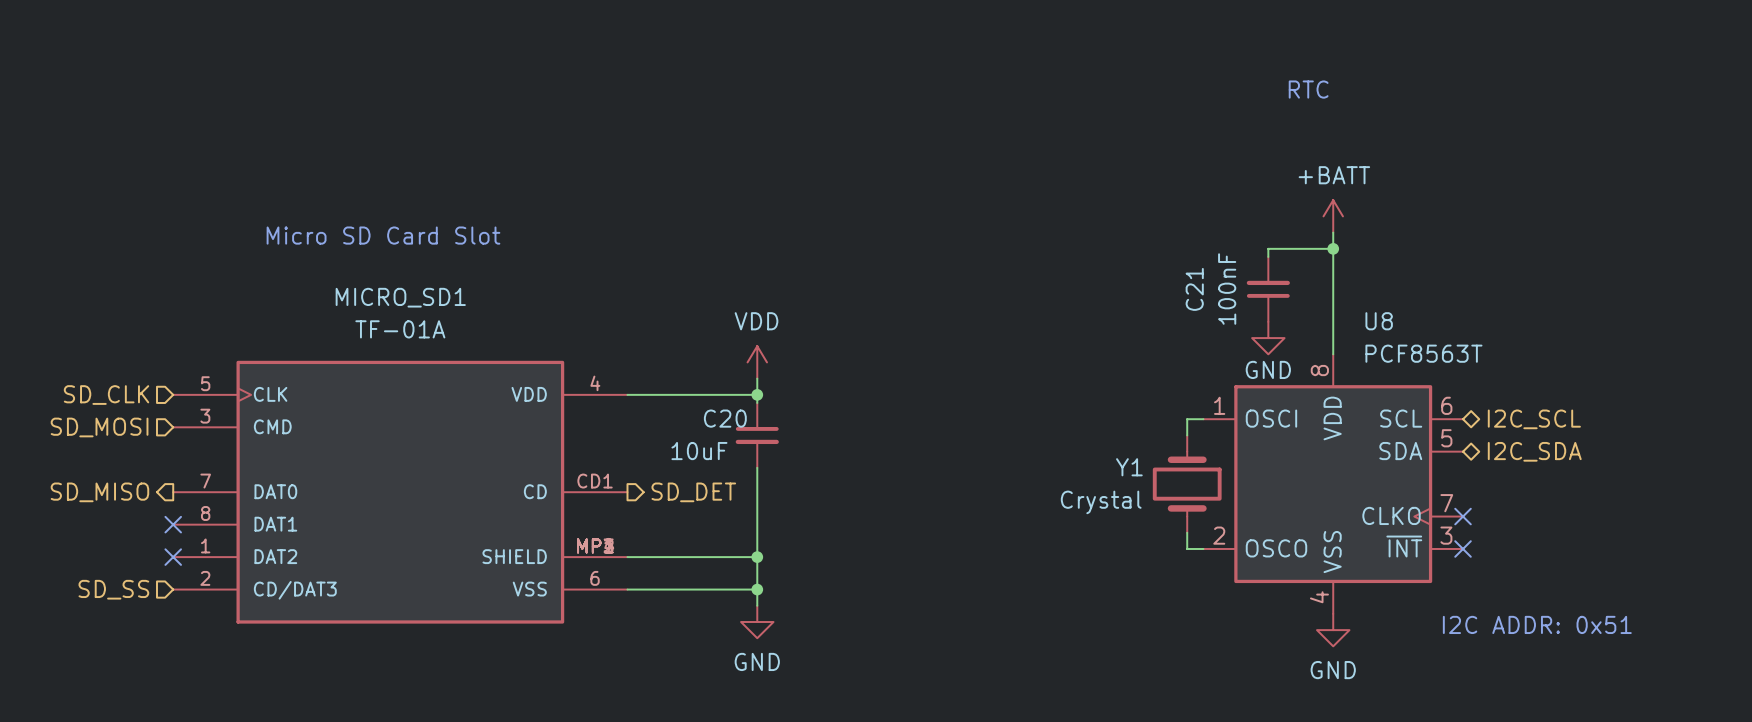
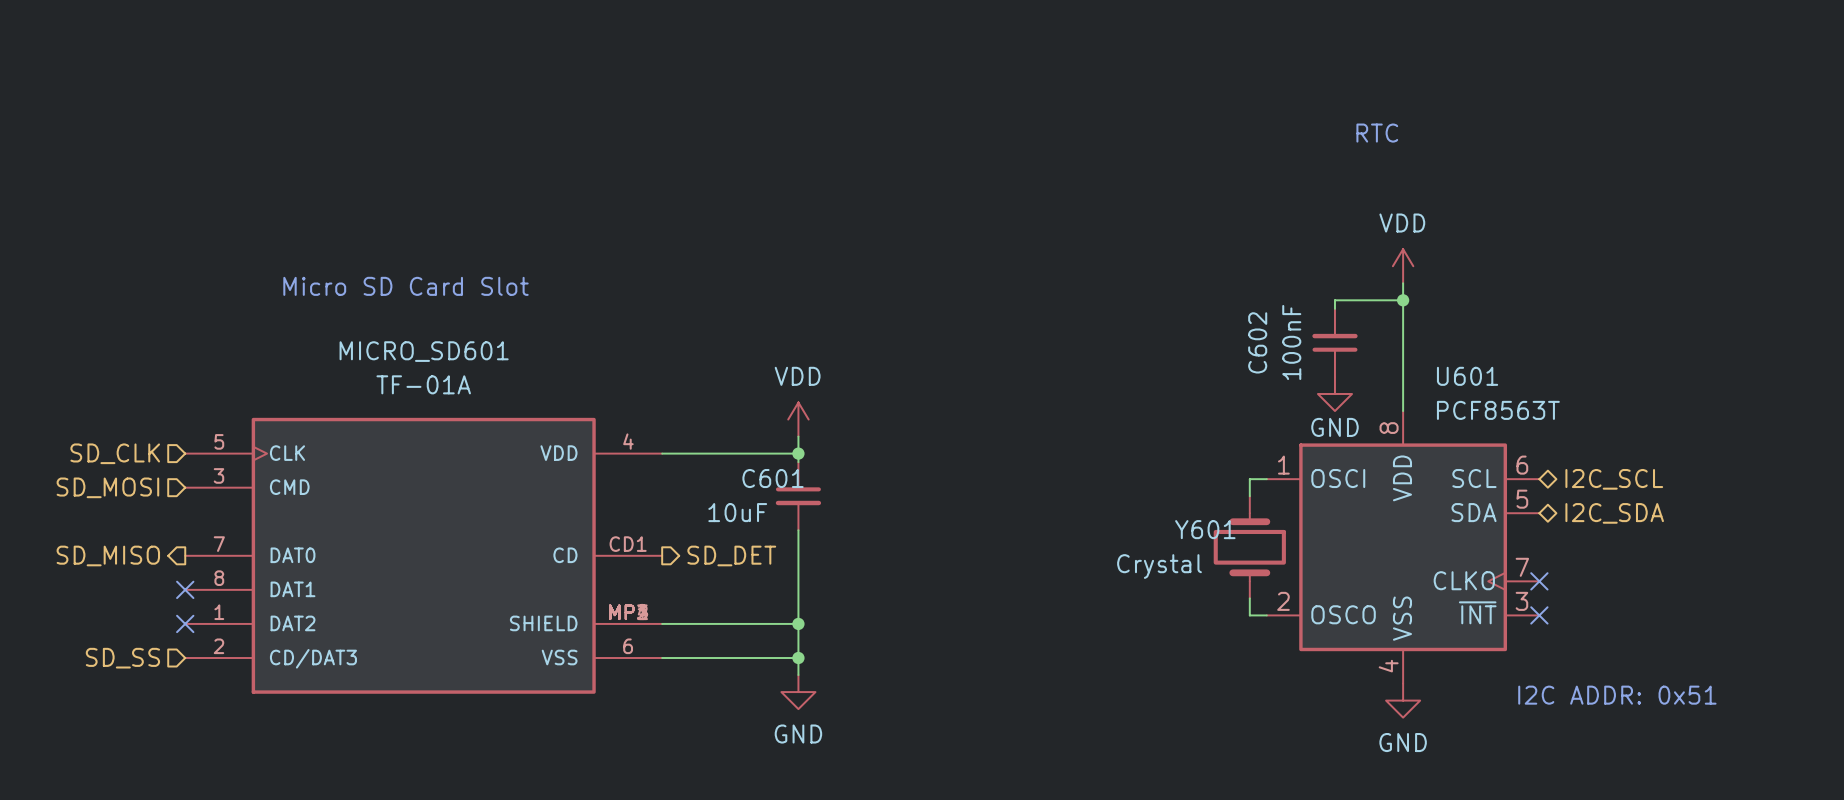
power symbol: +BATT (1333, 216) -> VDD (1403, 266)
C21 name: C21 (1194, 289) -> C602 (1257, 342)
MICRO_SD1 name: MICRO_SD1 (400, 297) -> MICRO_SD601 (424, 351)
U8 name: U8 (1379, 321) -> U601 (1467, 376)
C20 name: C20 (725, 418) -> C601 (773, 478)
Y1 name: Y1 (1129, 467) -> Y601 (1205, 529)

